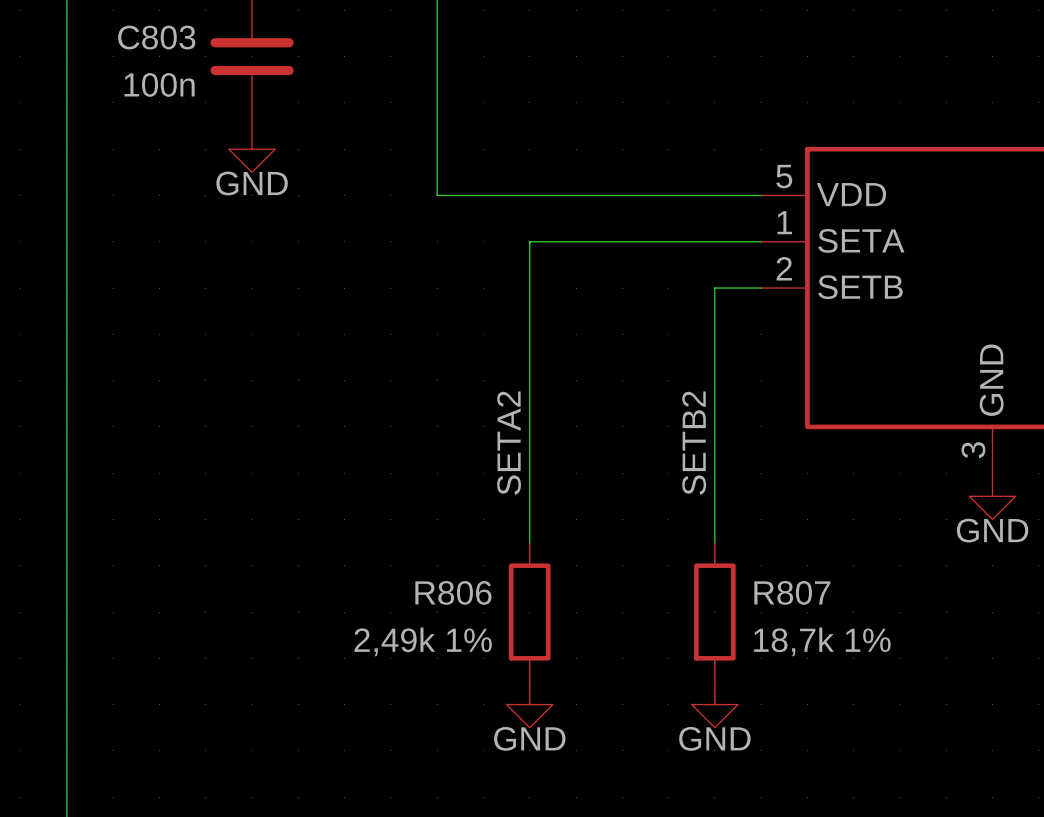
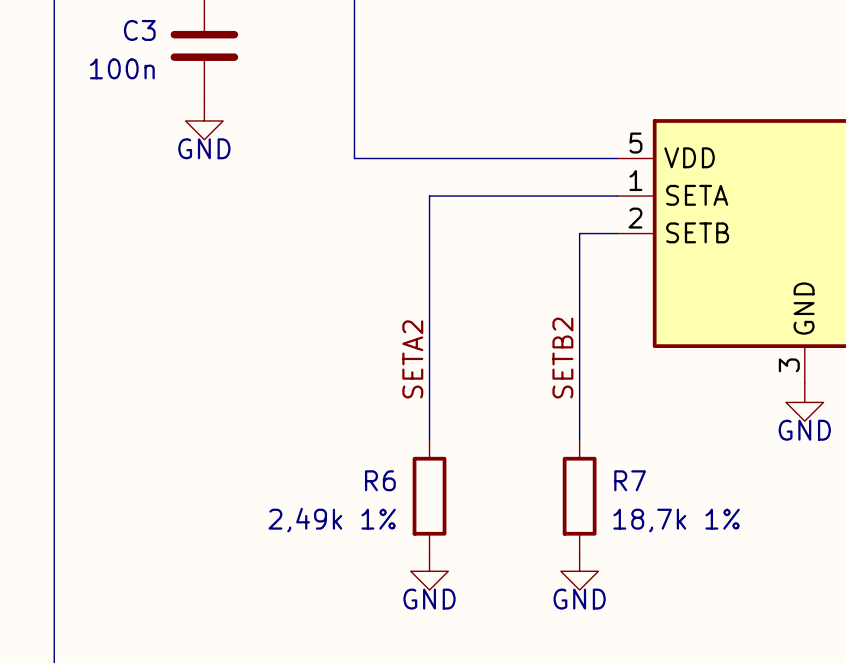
C803 name: C803 (156, 37) -> C3 (139, 30)
R806 name: R806 (453, 592) -> R6 (380, 480)
R807 name: R807 (792, 592) -> R7 (630, 480)

